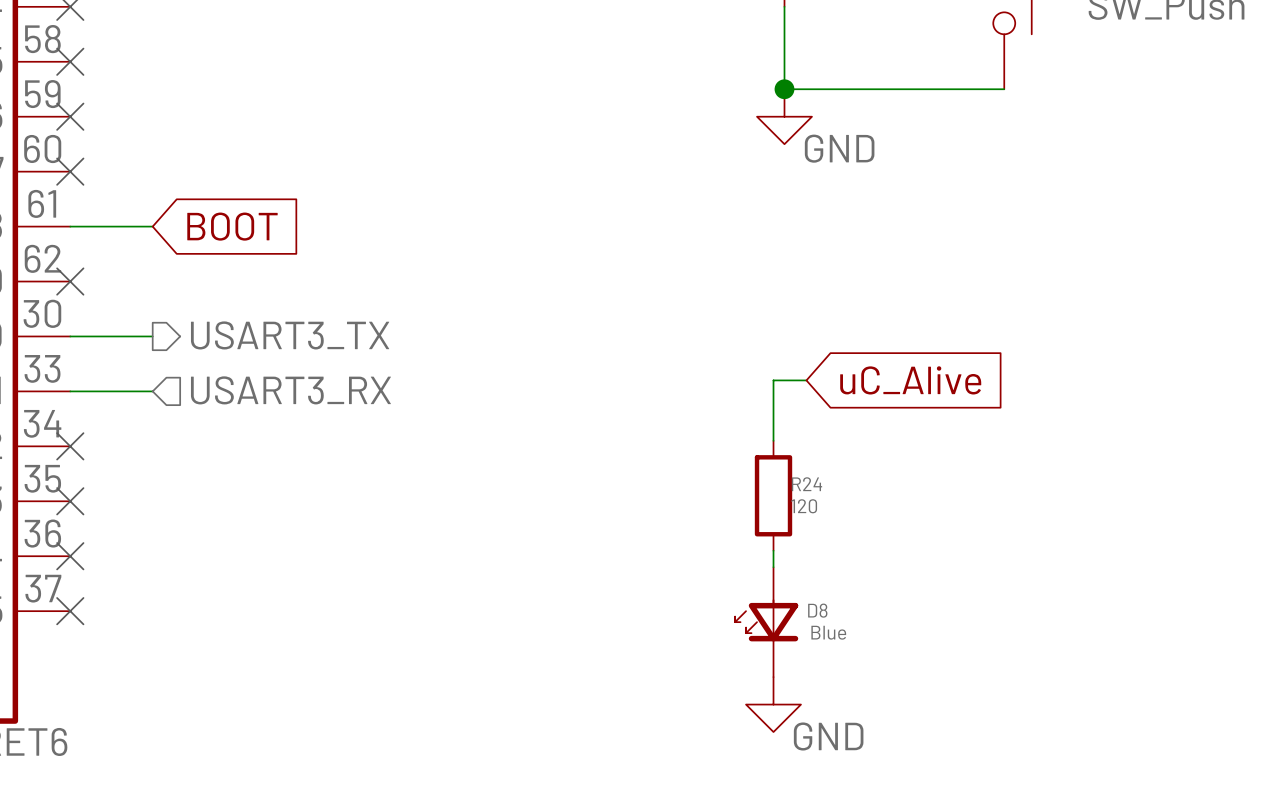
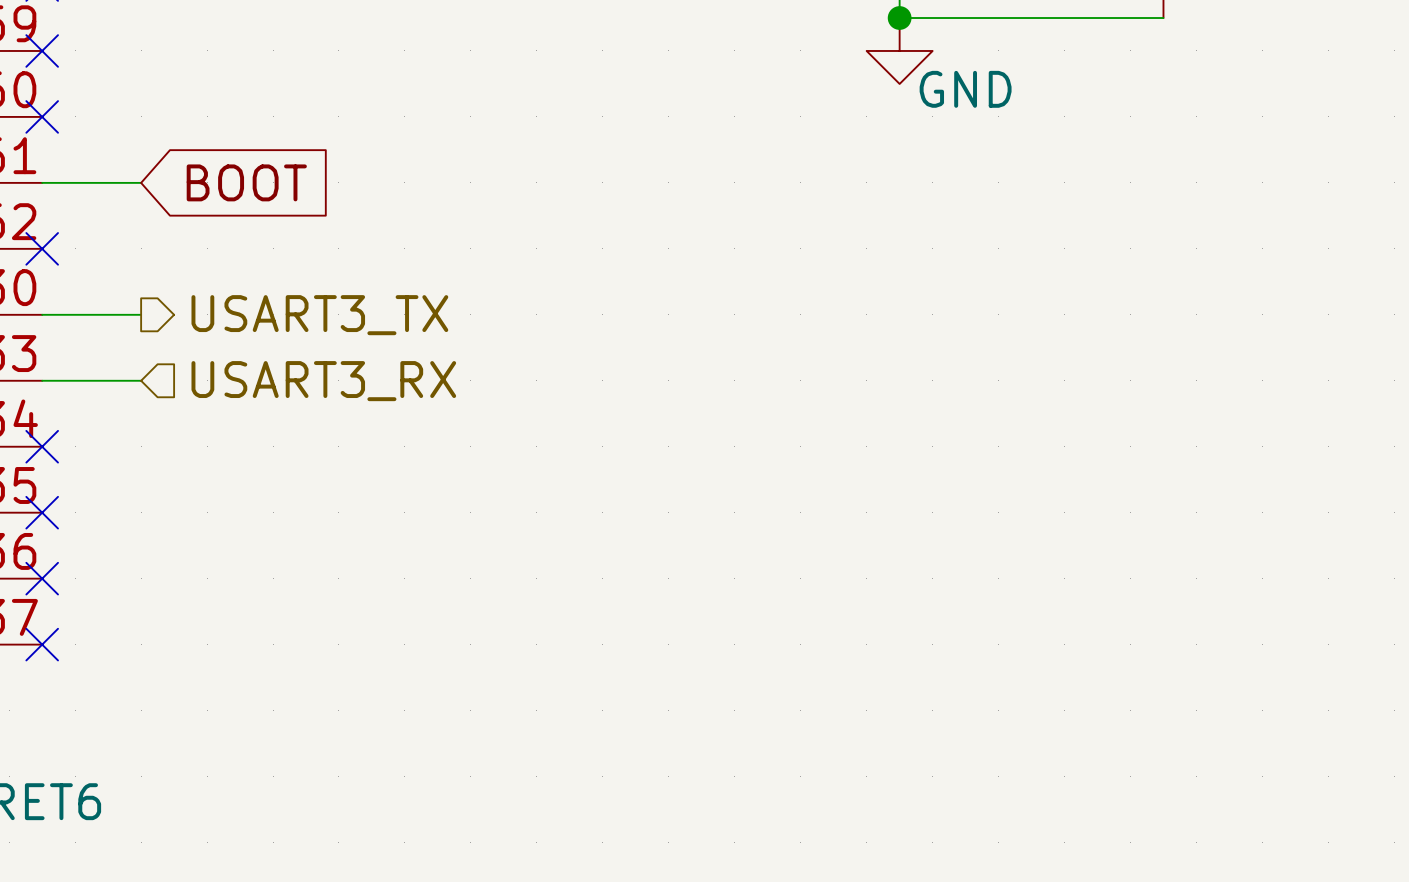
wire: (806, 380) (773, 380) (773, 440) -> none
global label: uC_Alive (910, 380) -> none
R24: 120 (773, 495) -> none
wire: (773, 550) (773, 567) -> none
D8: Blue (766, 622) -> none
power symbol: GND (773, 704) -> none

